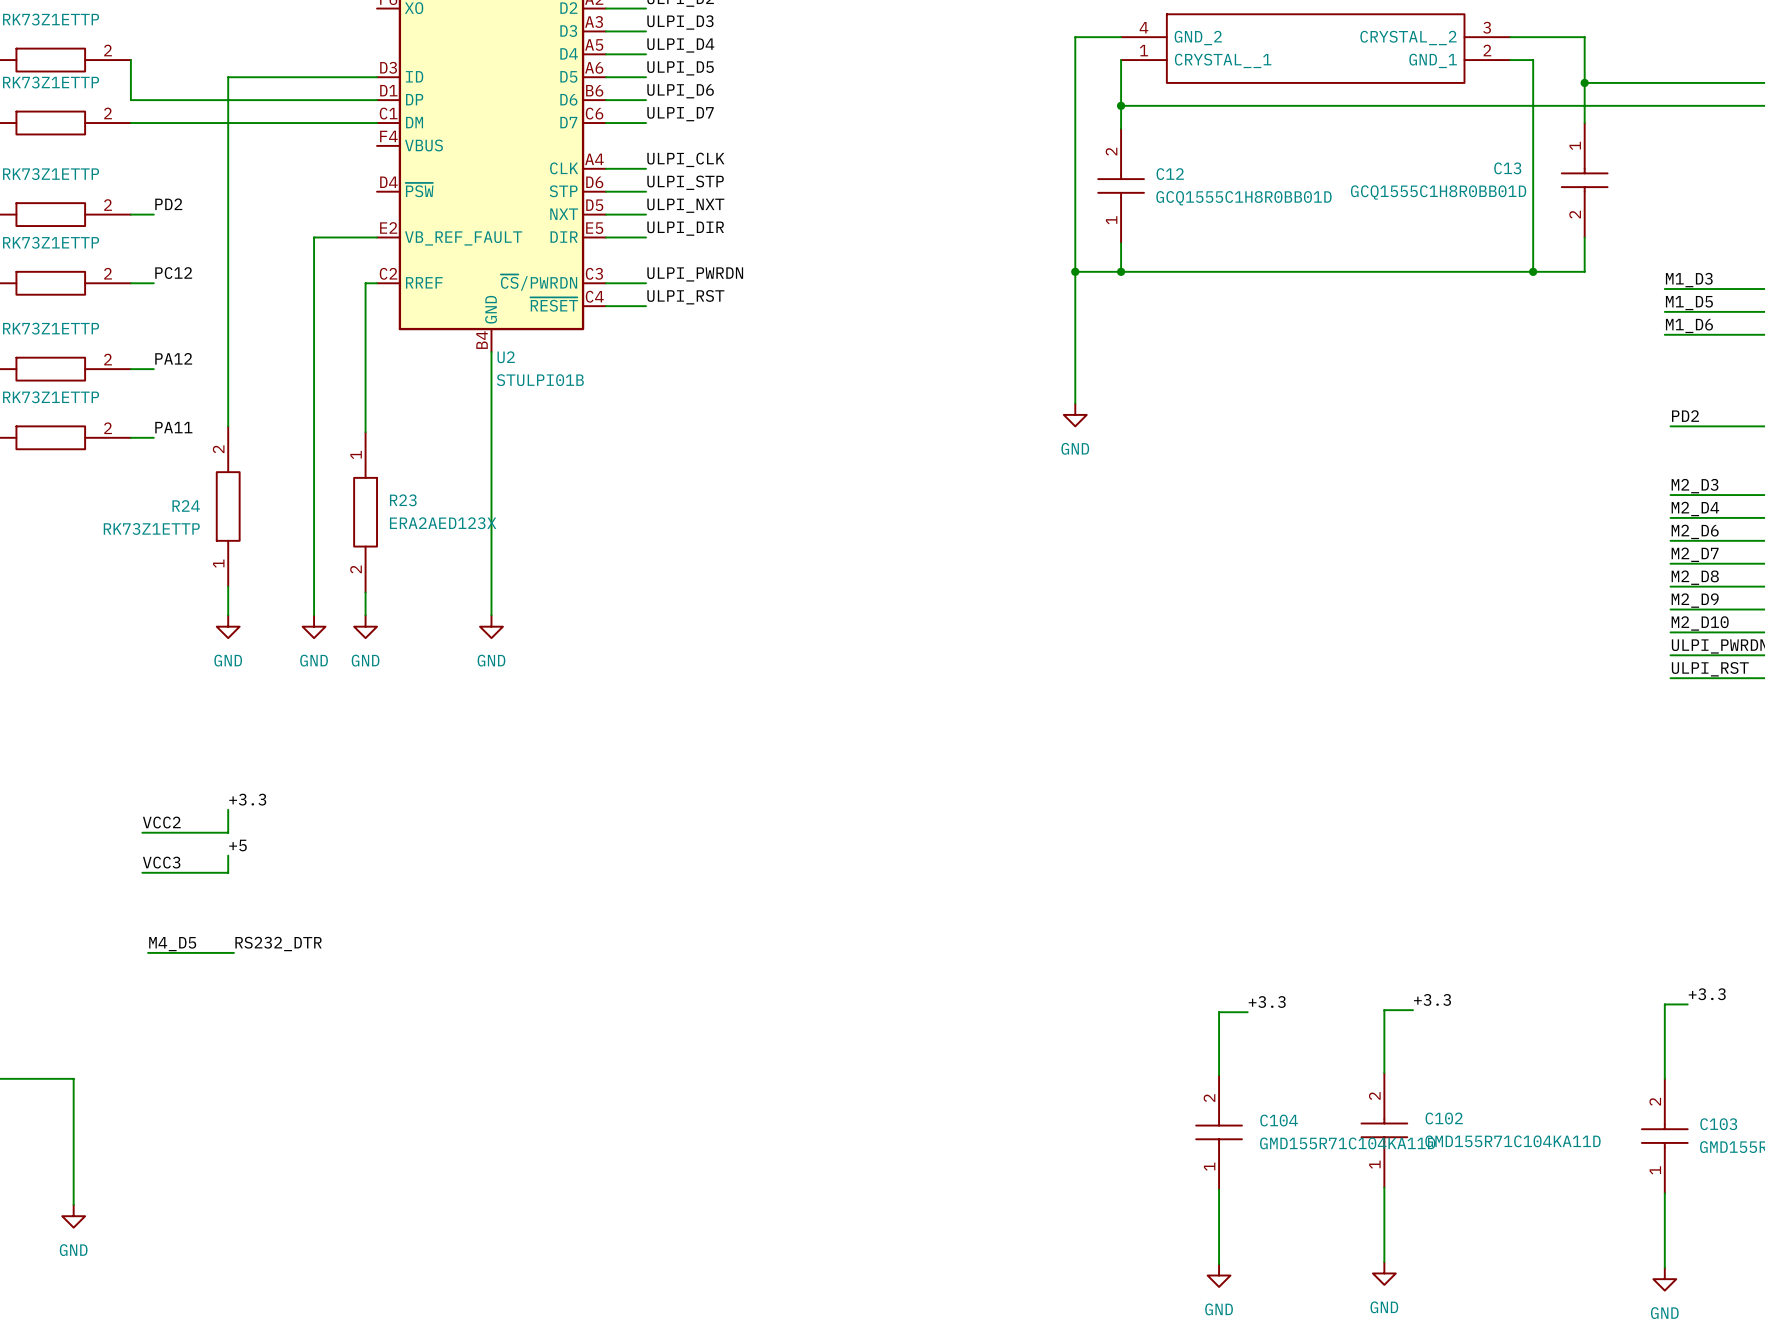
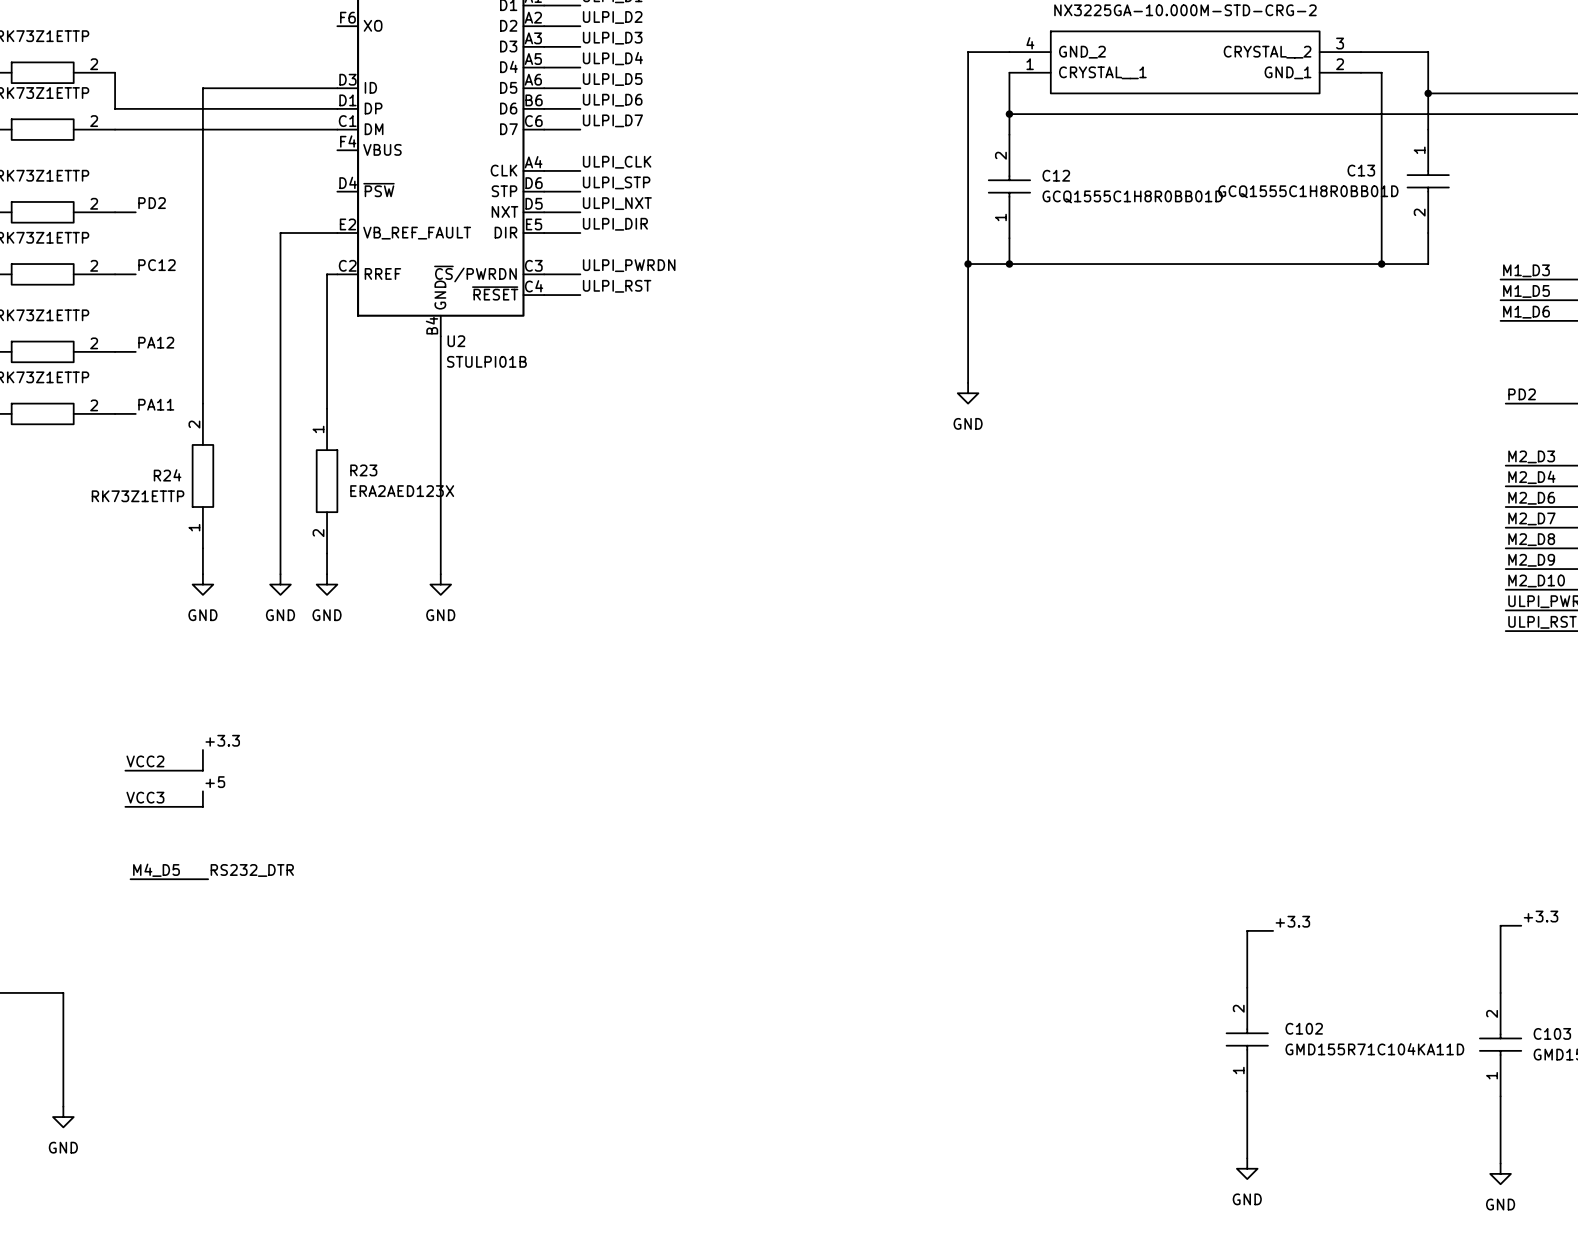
label: +3.3 (1267, 1002) -> none
wire: (1247, 1012) (1219, 1012) (1219, 1075) -> none
C104: GMD155R71C104KA11D (1219, 1132) -> none
wire: (1219, 1189) (1219, 1264) -> none
power symbol: GND (1219, 1275) -> none

